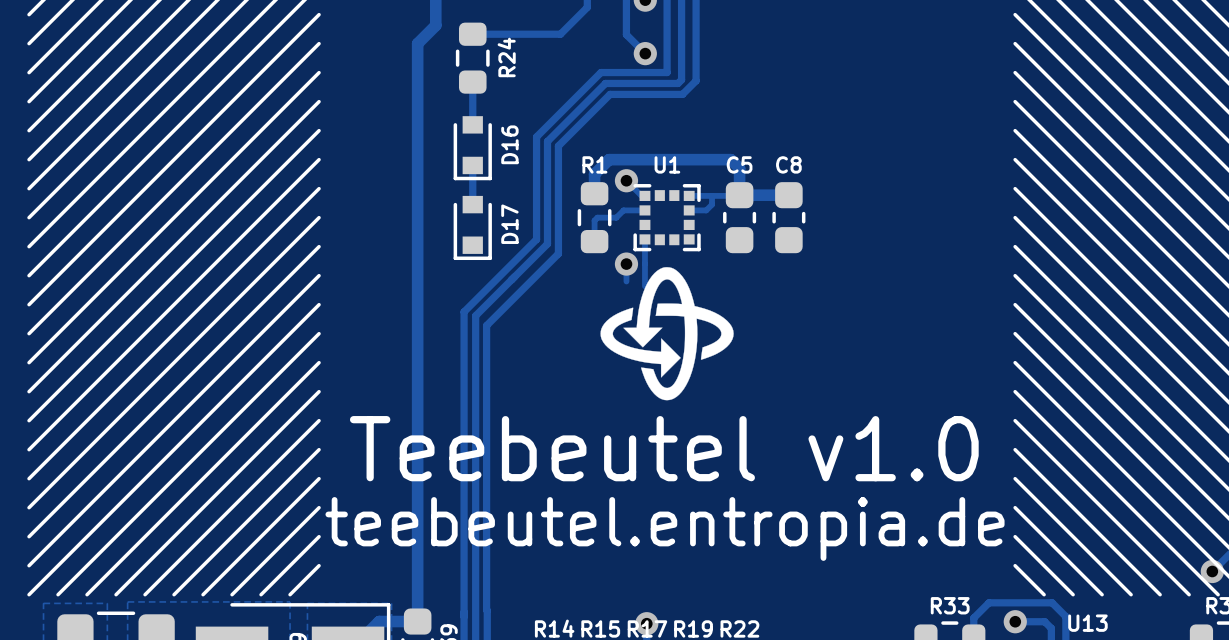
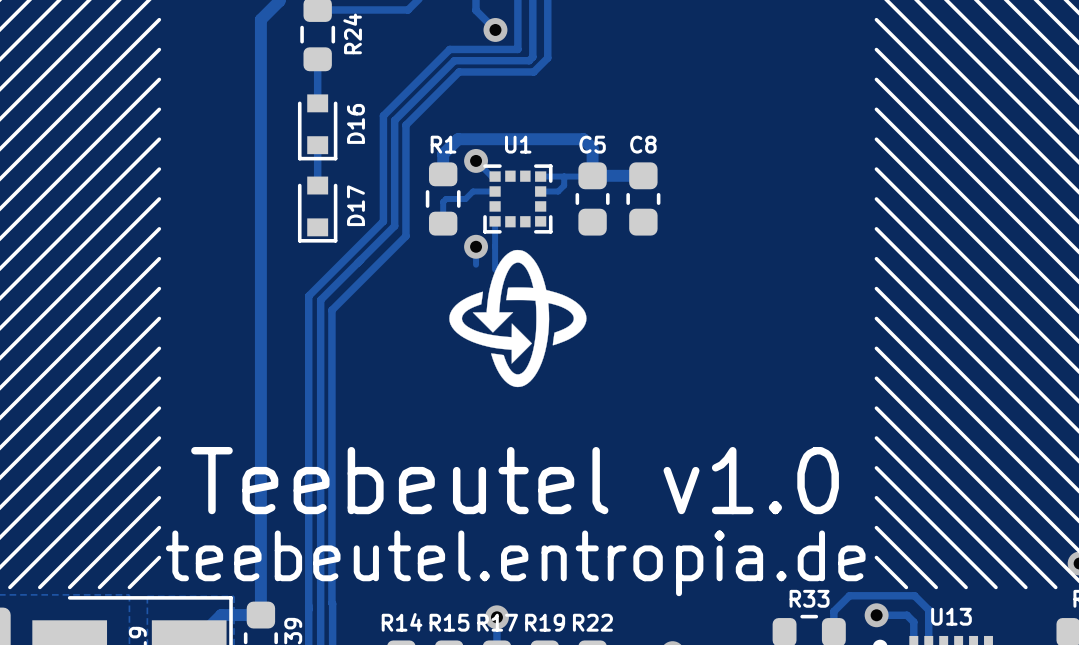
text position: Teebeutel v1.0 (664, 448) -> Teebeutel v1.0 (515, 480)
text position: teebeutel.entropia.de (665, 528) -> teebeutel.entropia.de (515, 563)

